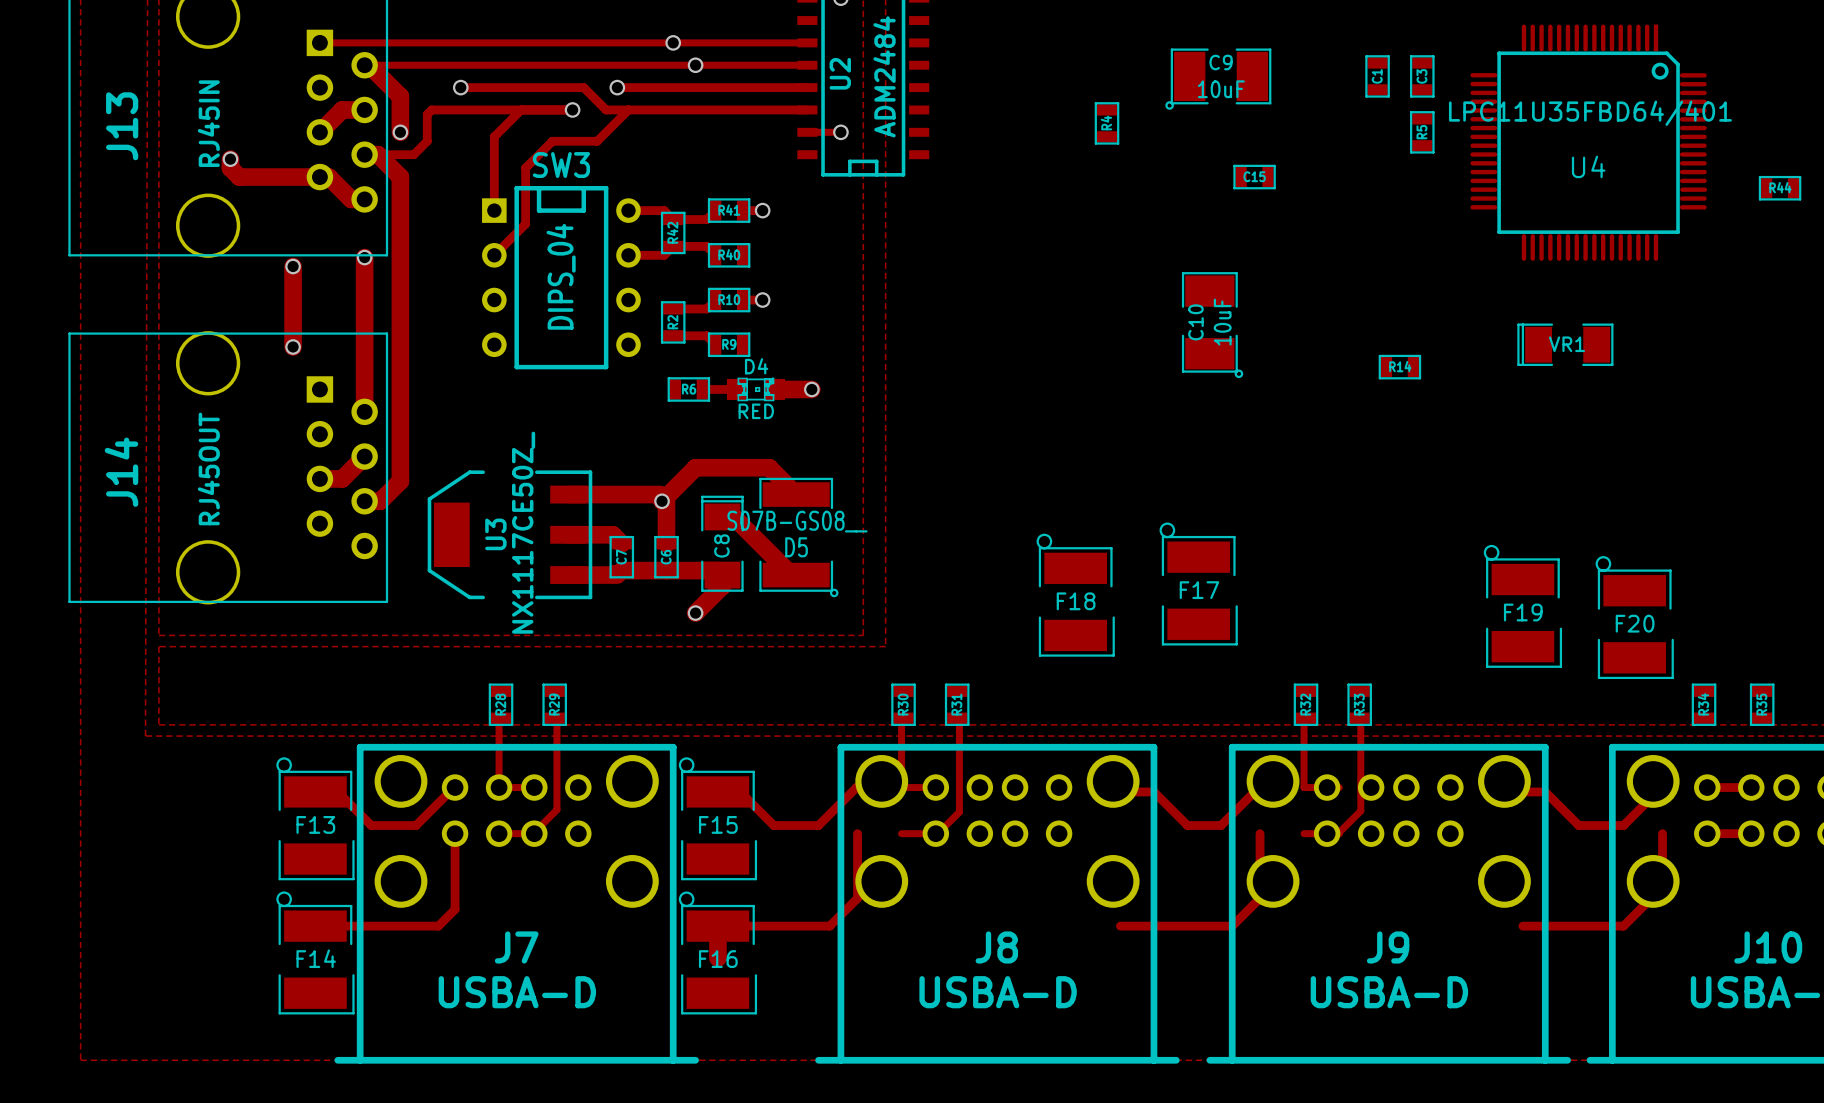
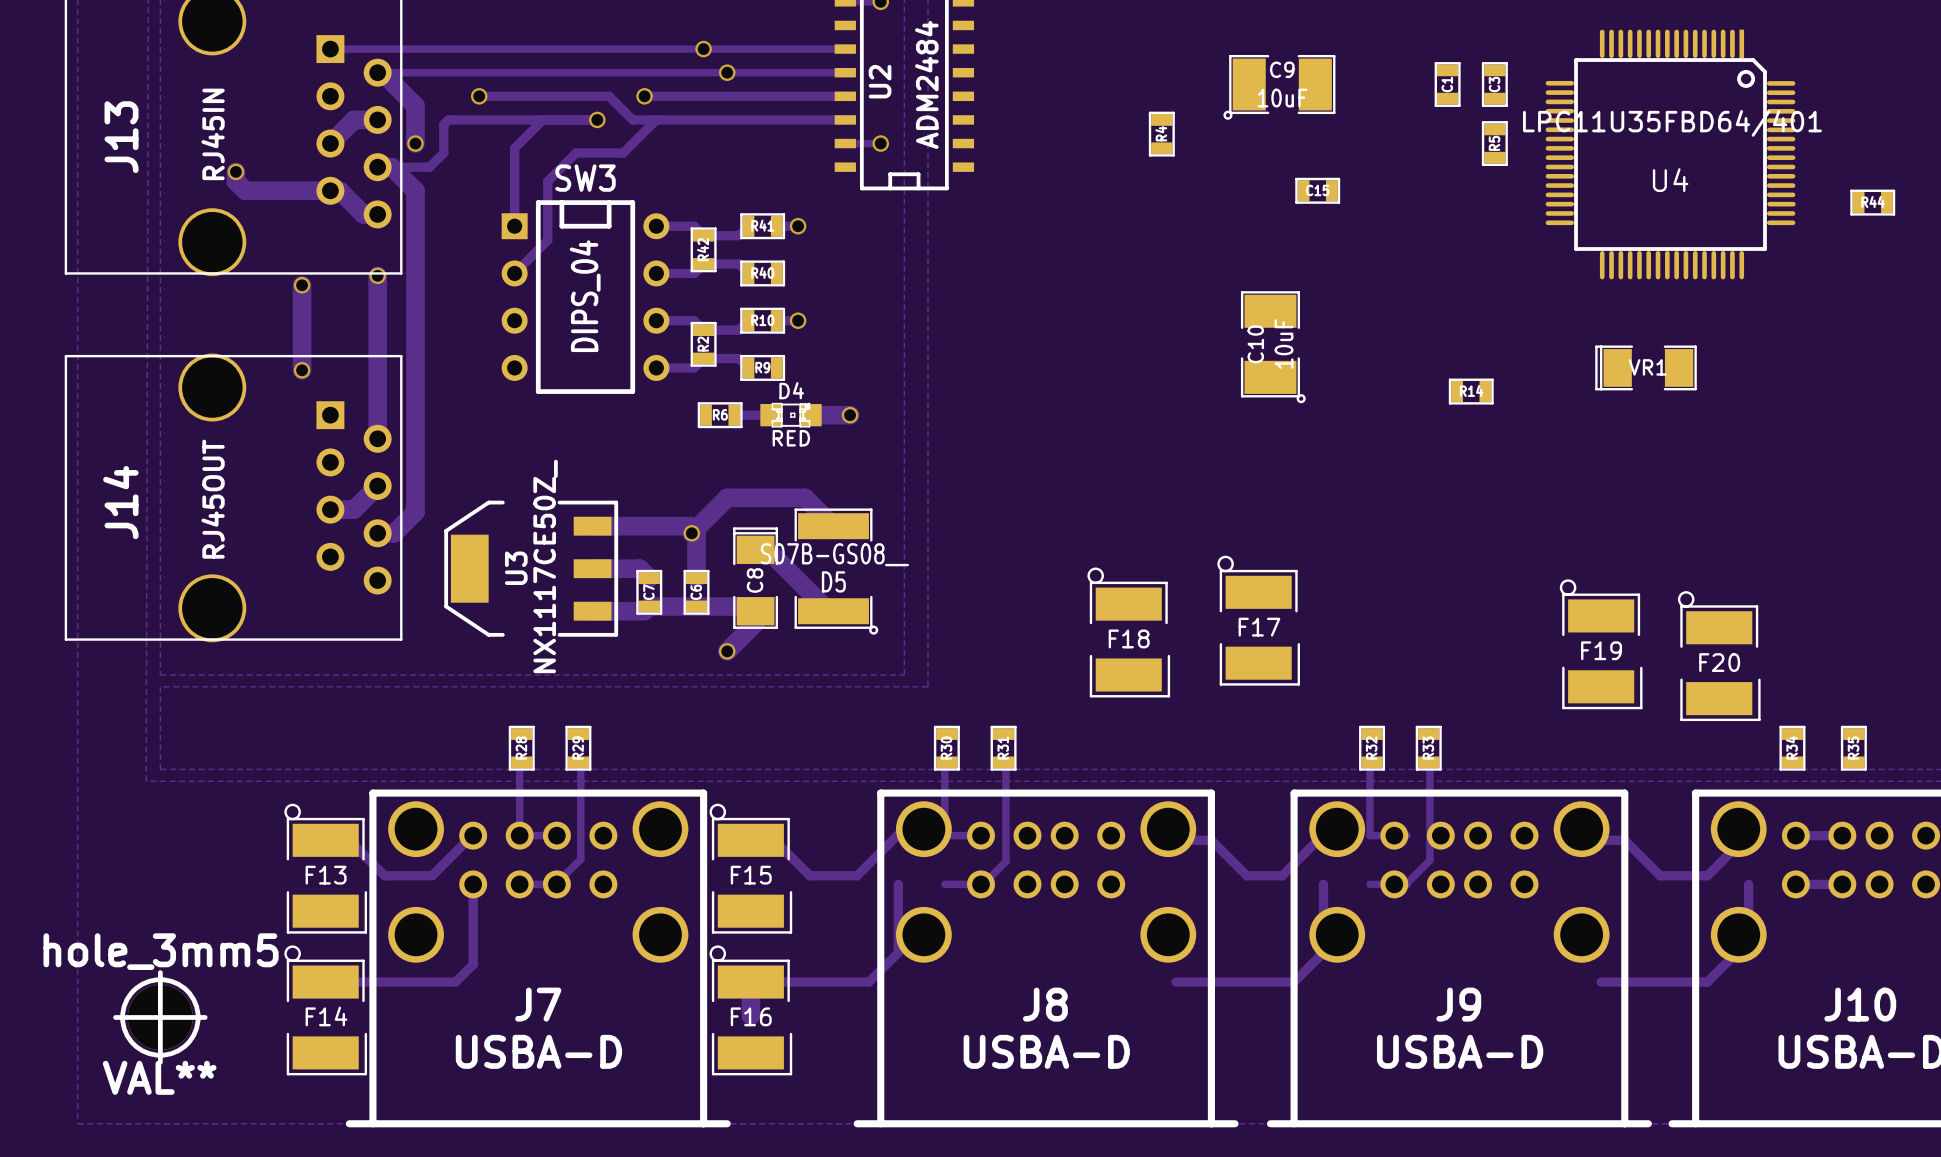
track: none -> (656, 320) (694, 320) (703, 330)
track: none -> (703, 358) (694, 367) (656, 367)
hole_3mm5: none -> VAL** (160, 1017)

